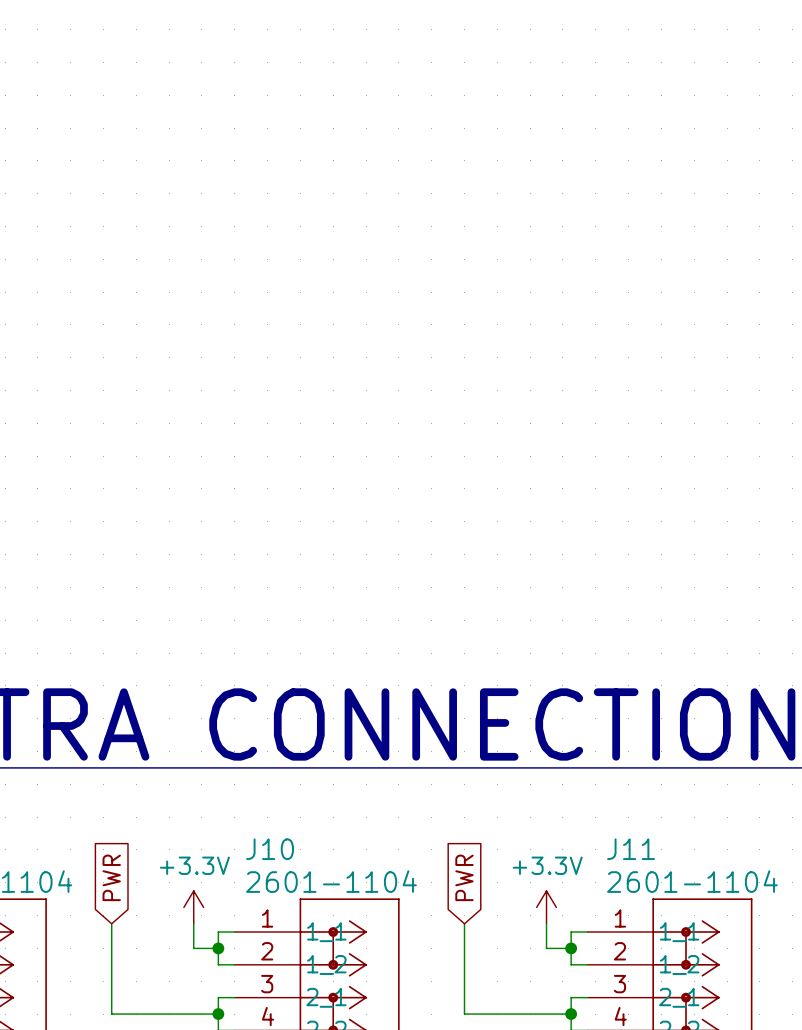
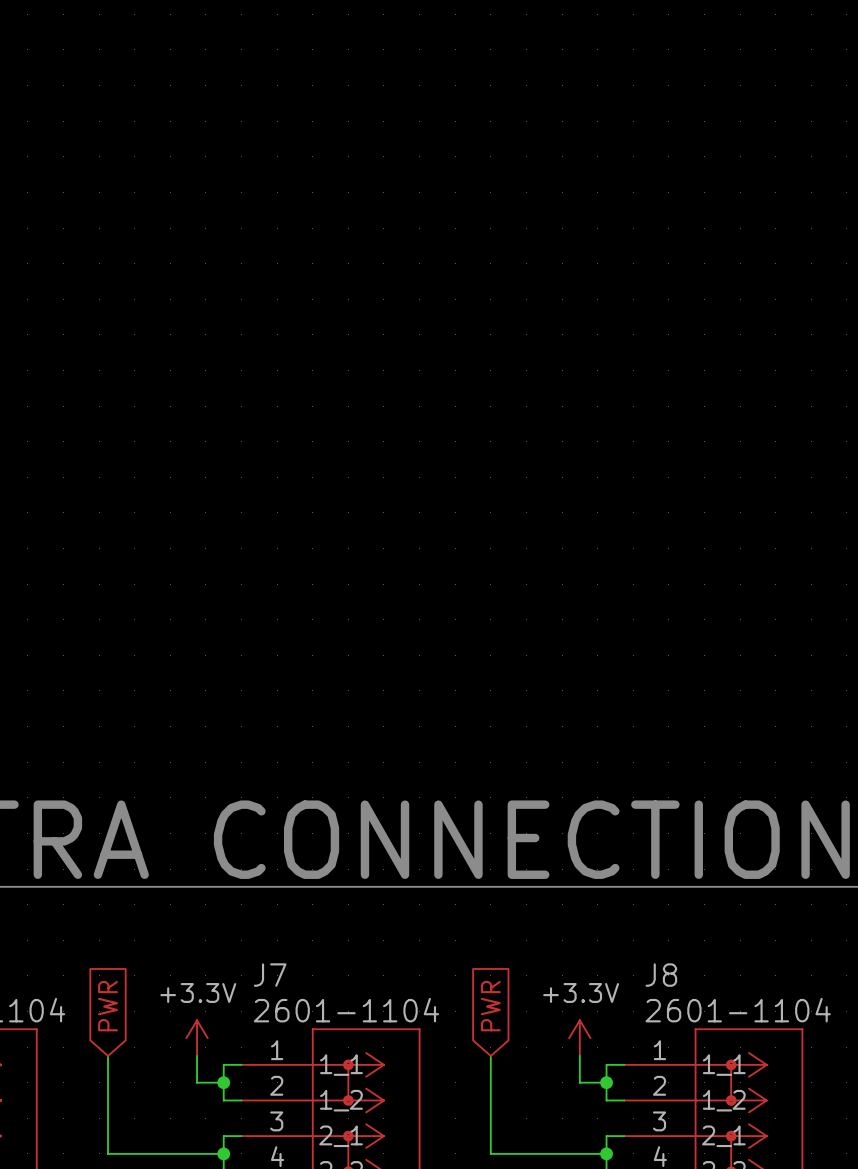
J10 name: J10 (270, 849) -> J7 (270, 975)
J11 name: J11 (631, 849) -> J8 (661, 975)

